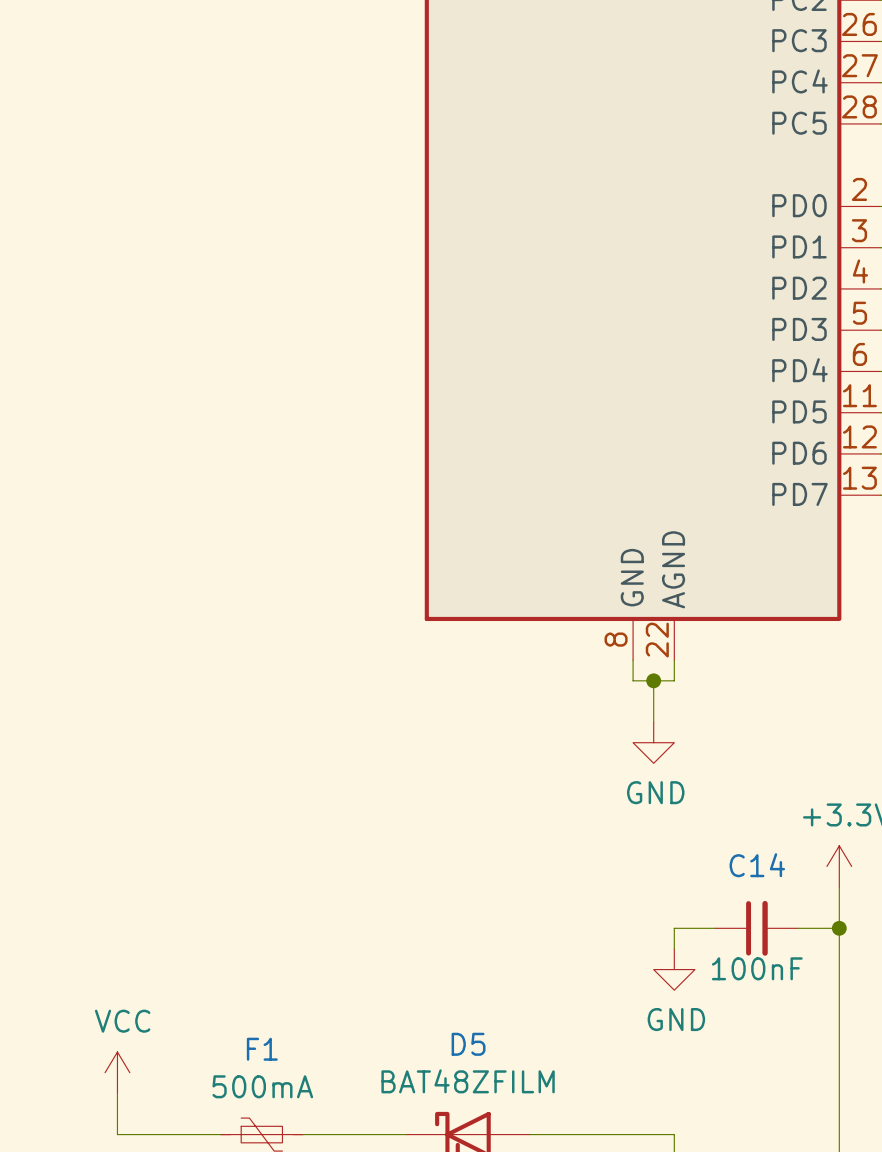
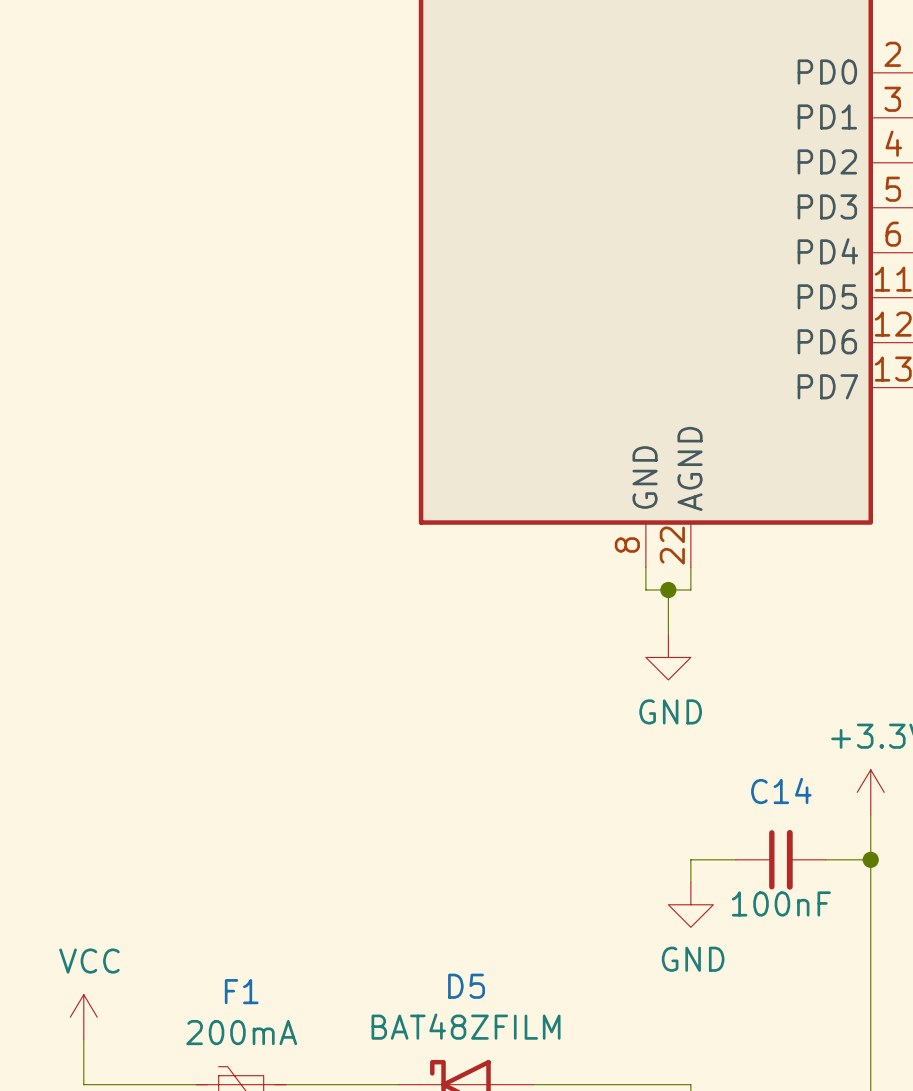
F1 value: 500mA (262, 1086) -> 200mA (241, 1032)

